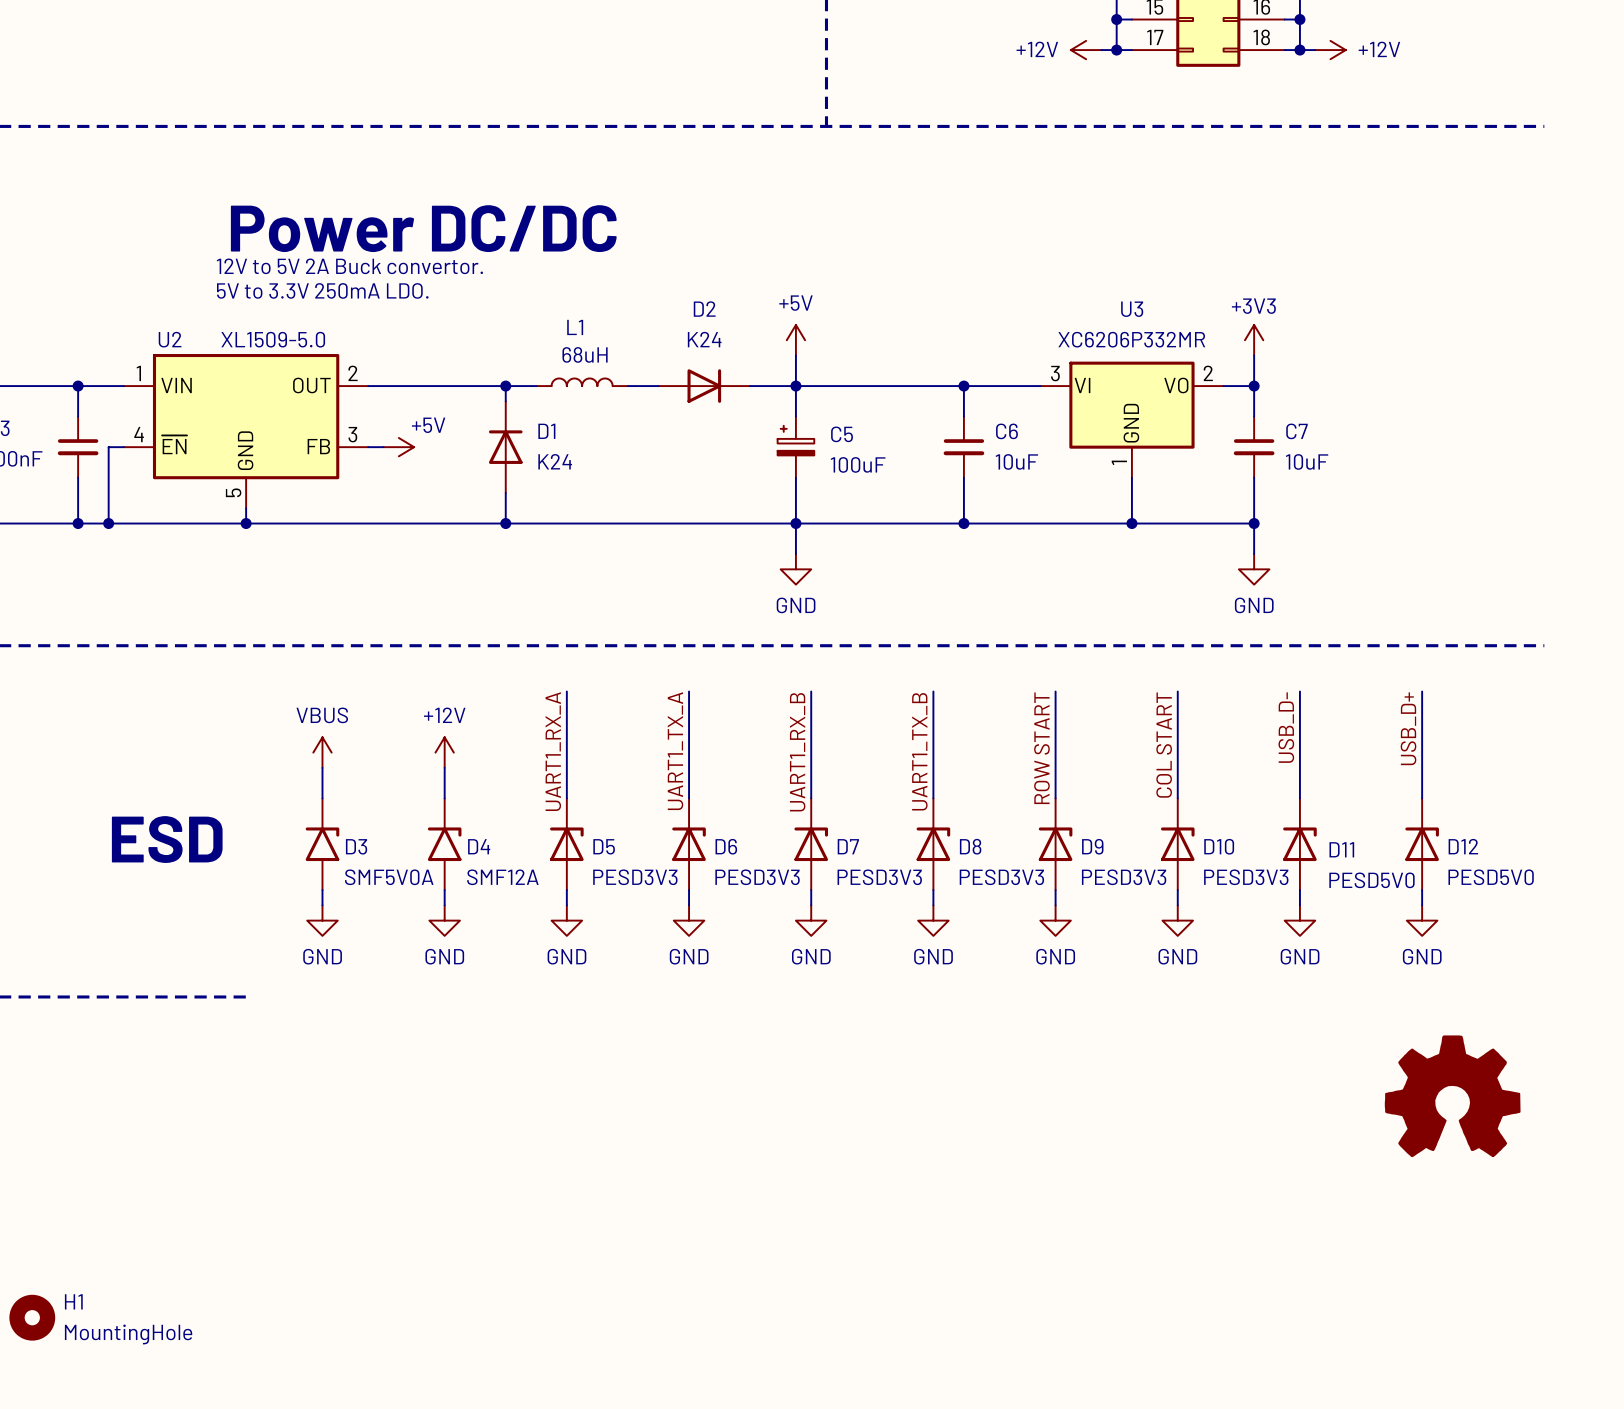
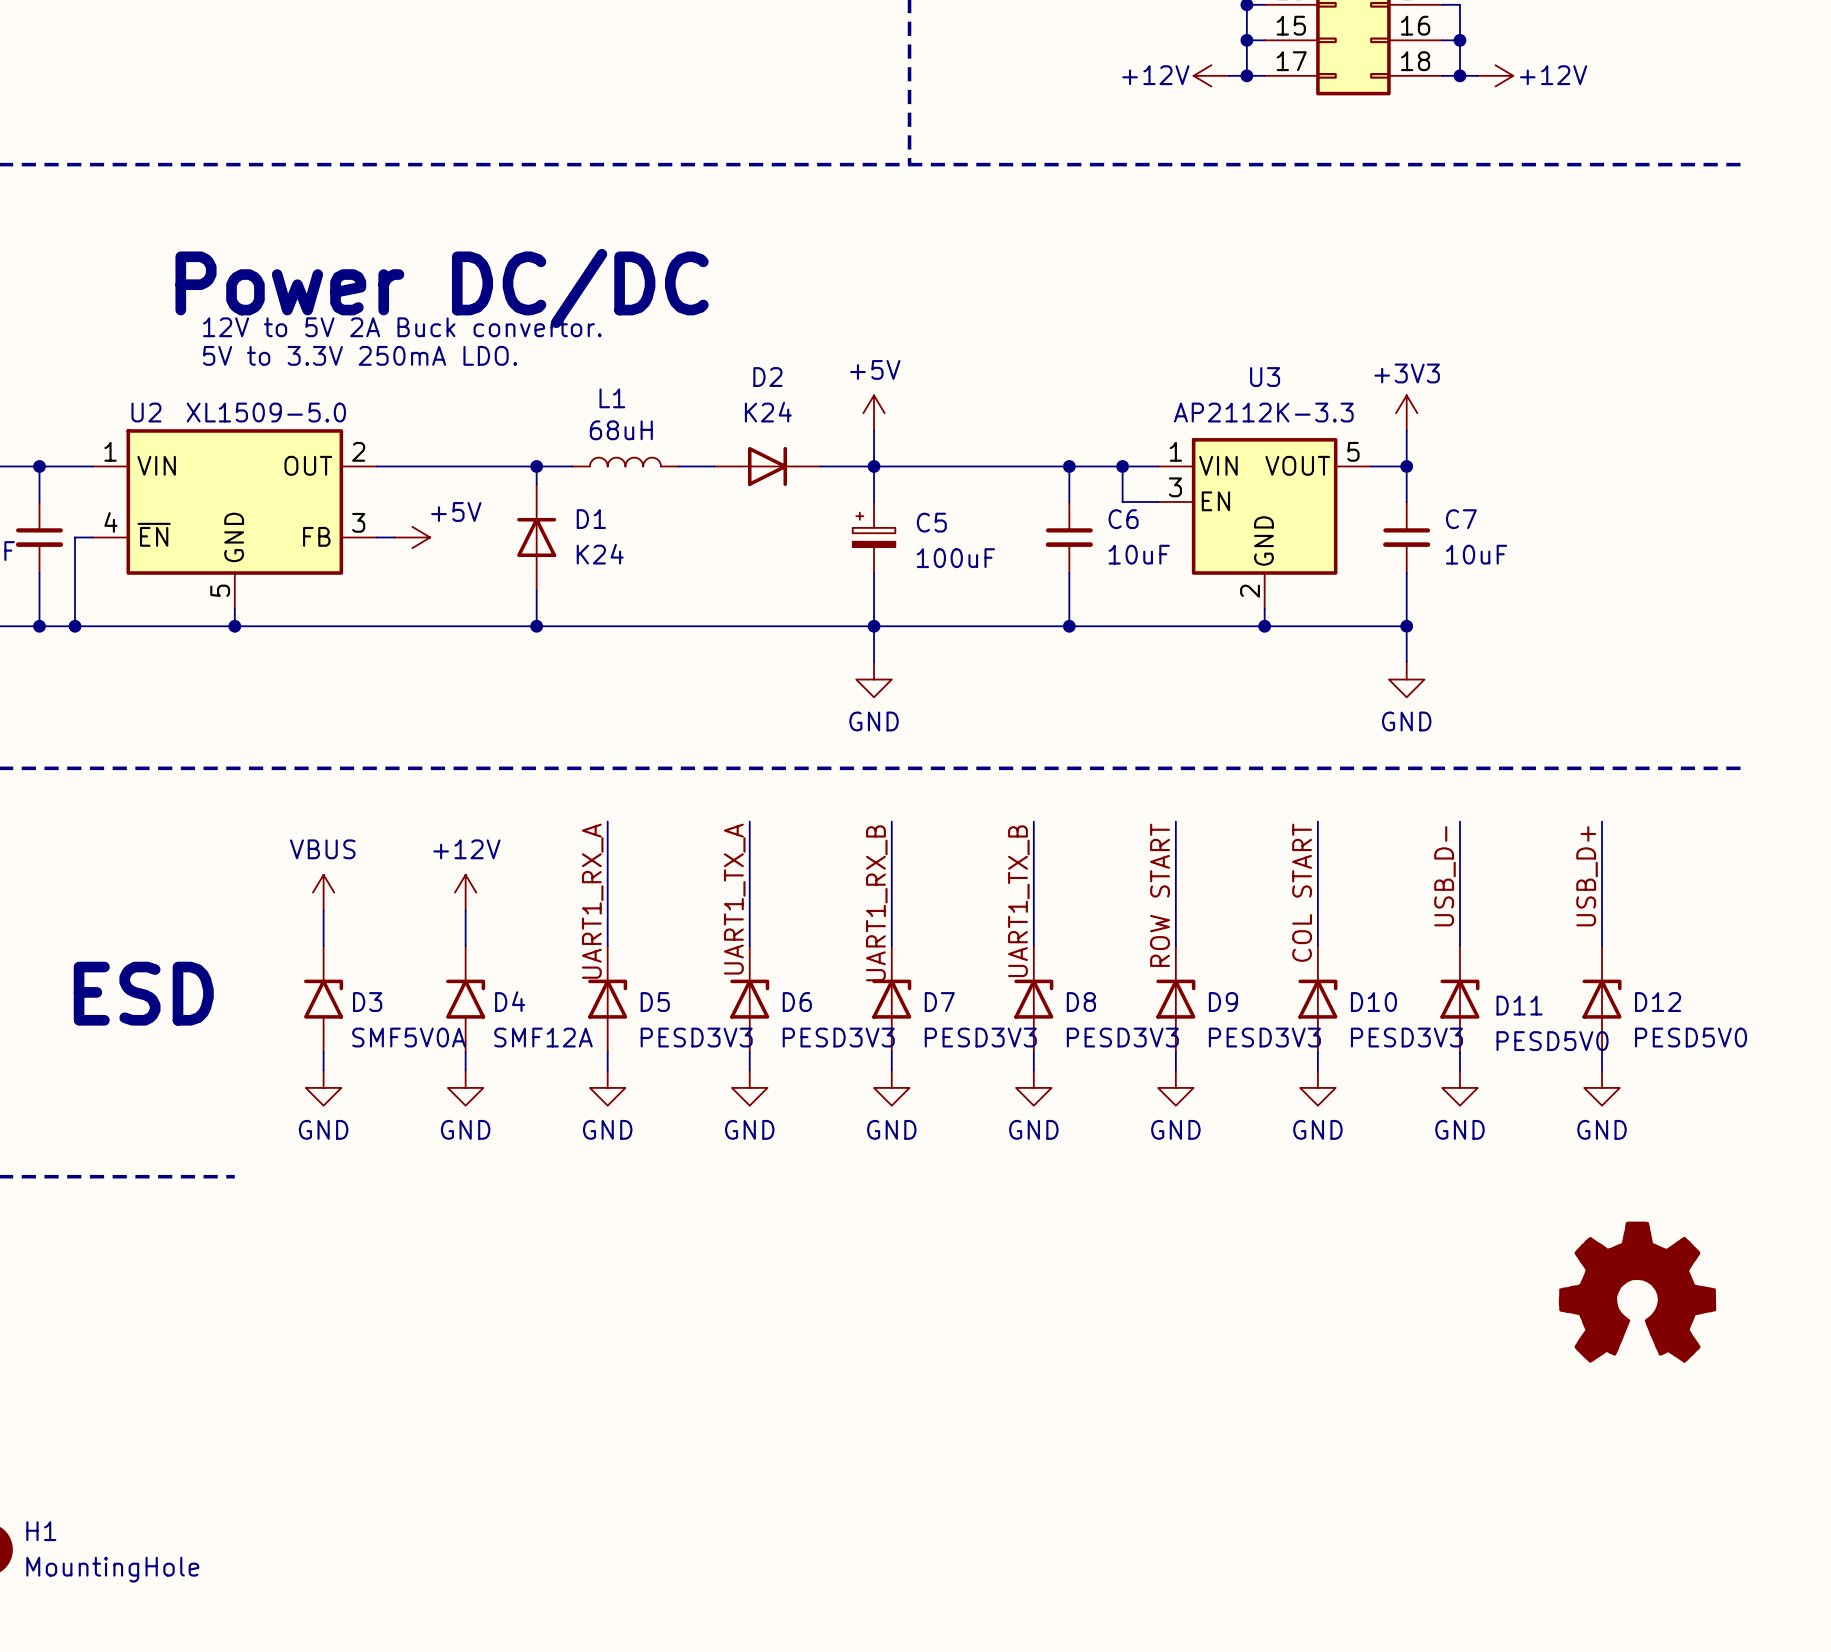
U3 value: XC6206P332MR (1131, 339) -> AP2112K-3.3 (1263, 412)
U3 symbol: [1040, 361, 1224, 478] -> [1158, 438, 1372, 609]
wire: none -> (1122, 466) (1122, 501) (1158, 501)
junction: none -> (1122, 466)

